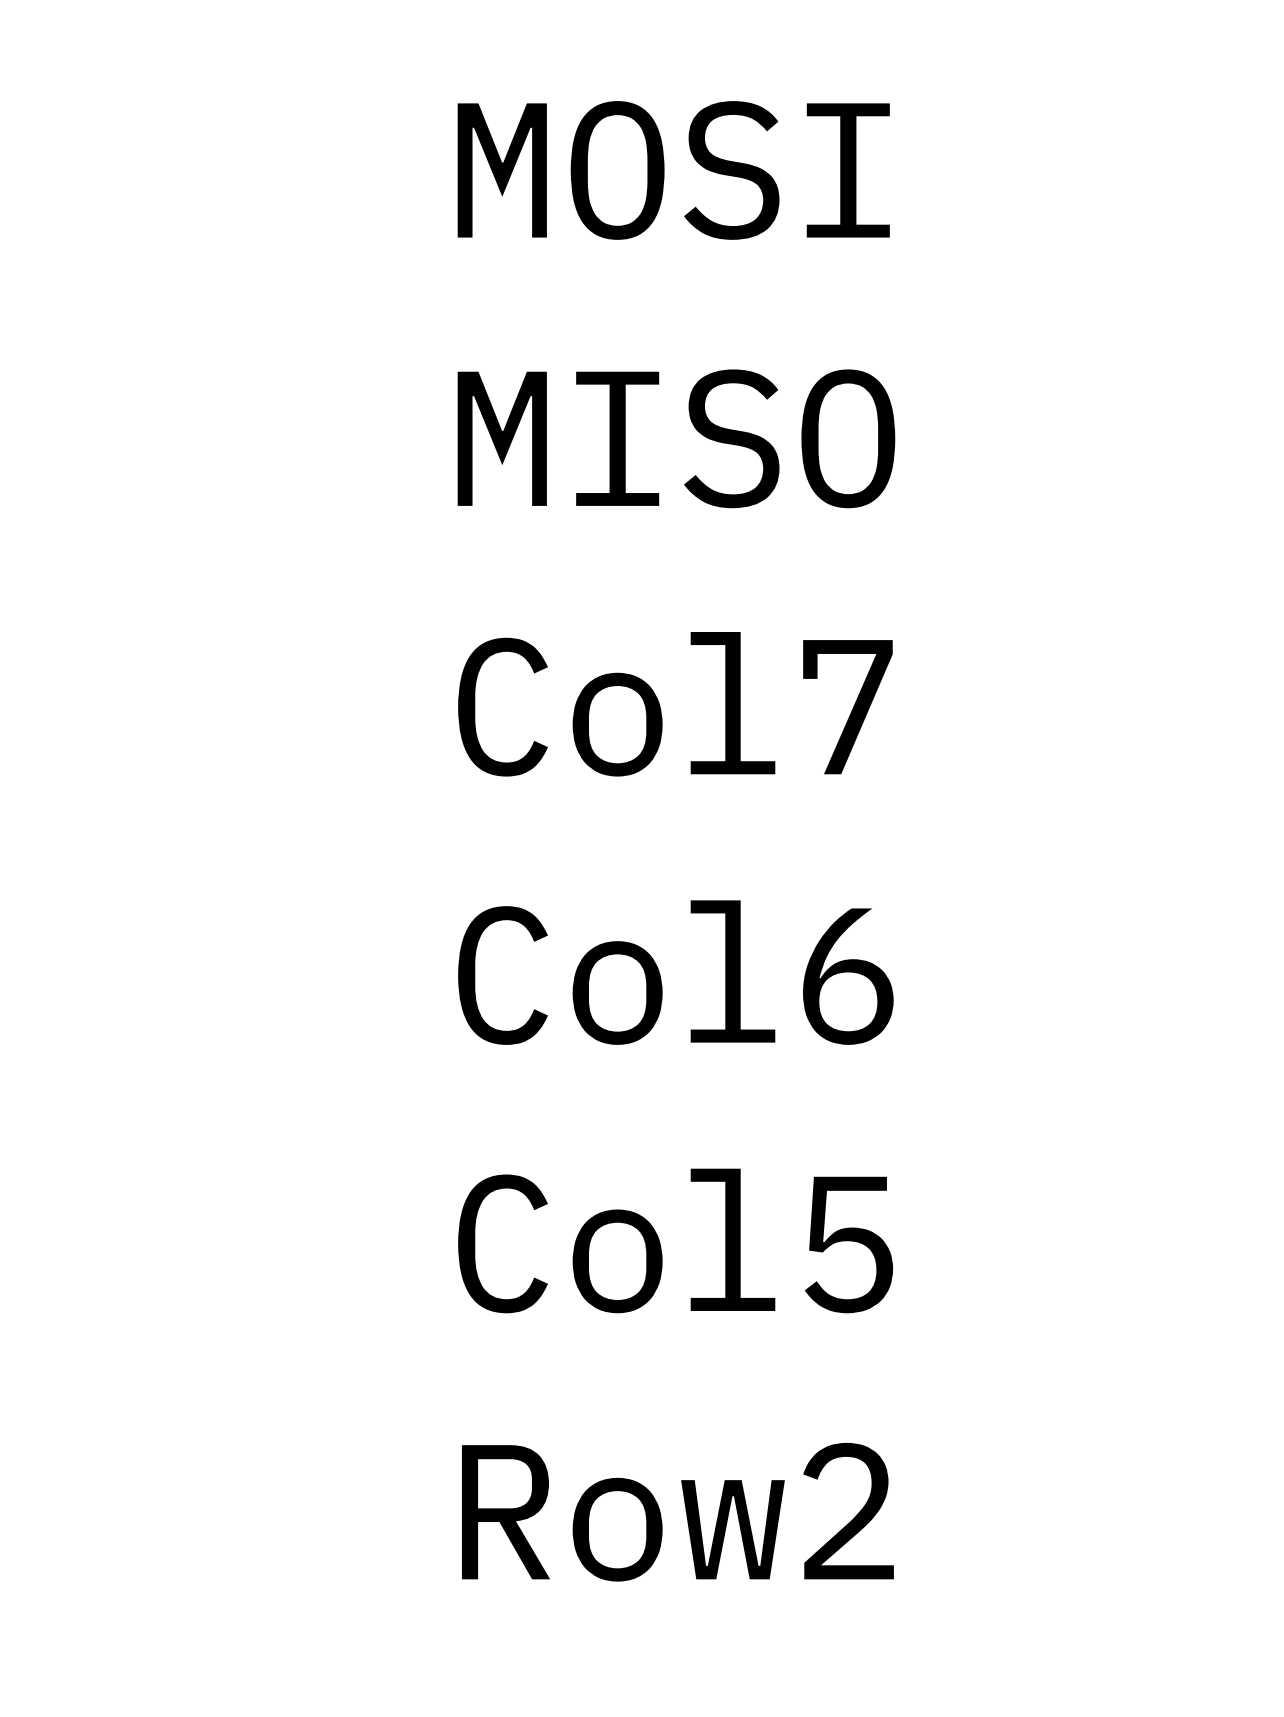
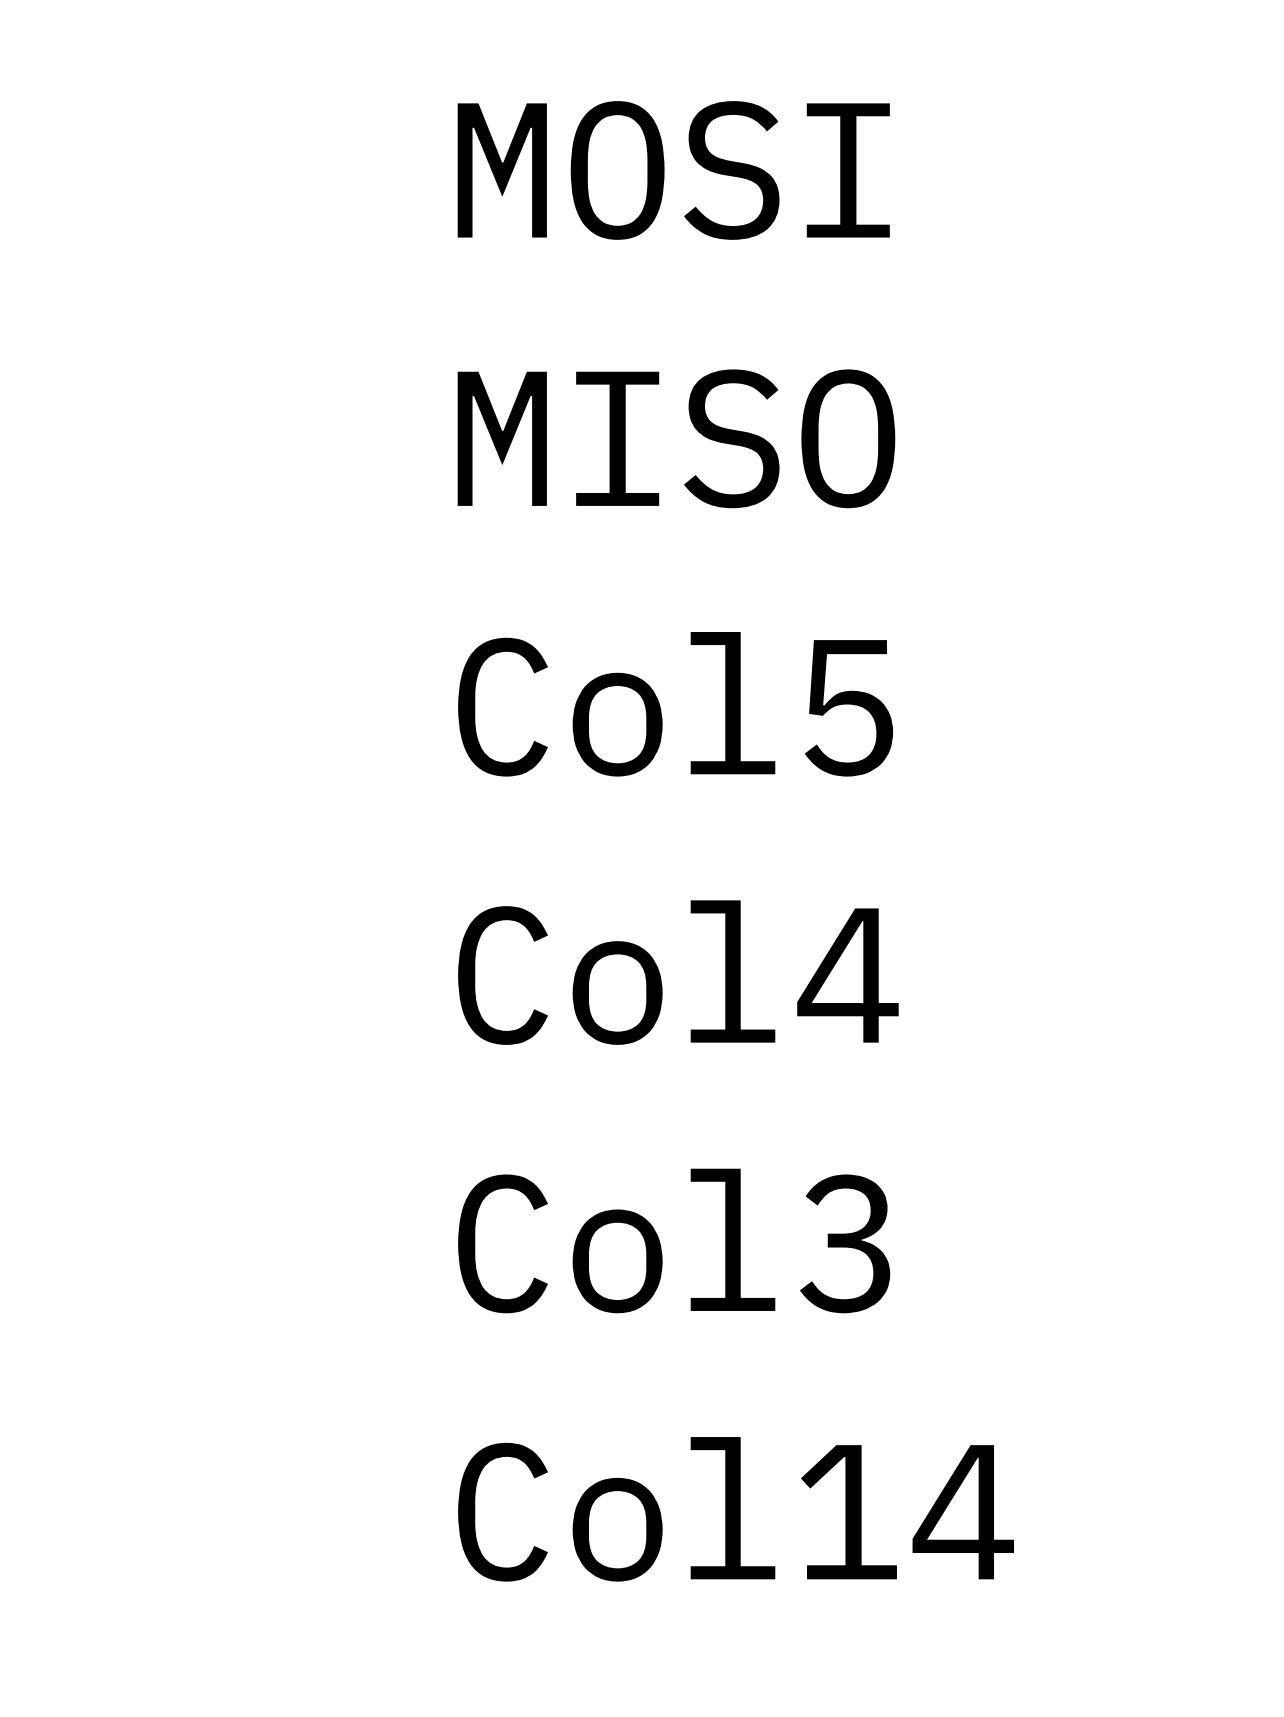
label: Col7 (675, 704) -> Col5 (675, 704)
label: Col6 (675, 972) -> Col4 (678, 972)
label: Col5 (675, 1241) -> Col3 (674, 1241)
label: Row2 (677, 1512) -> Col14 (736, 1509)

